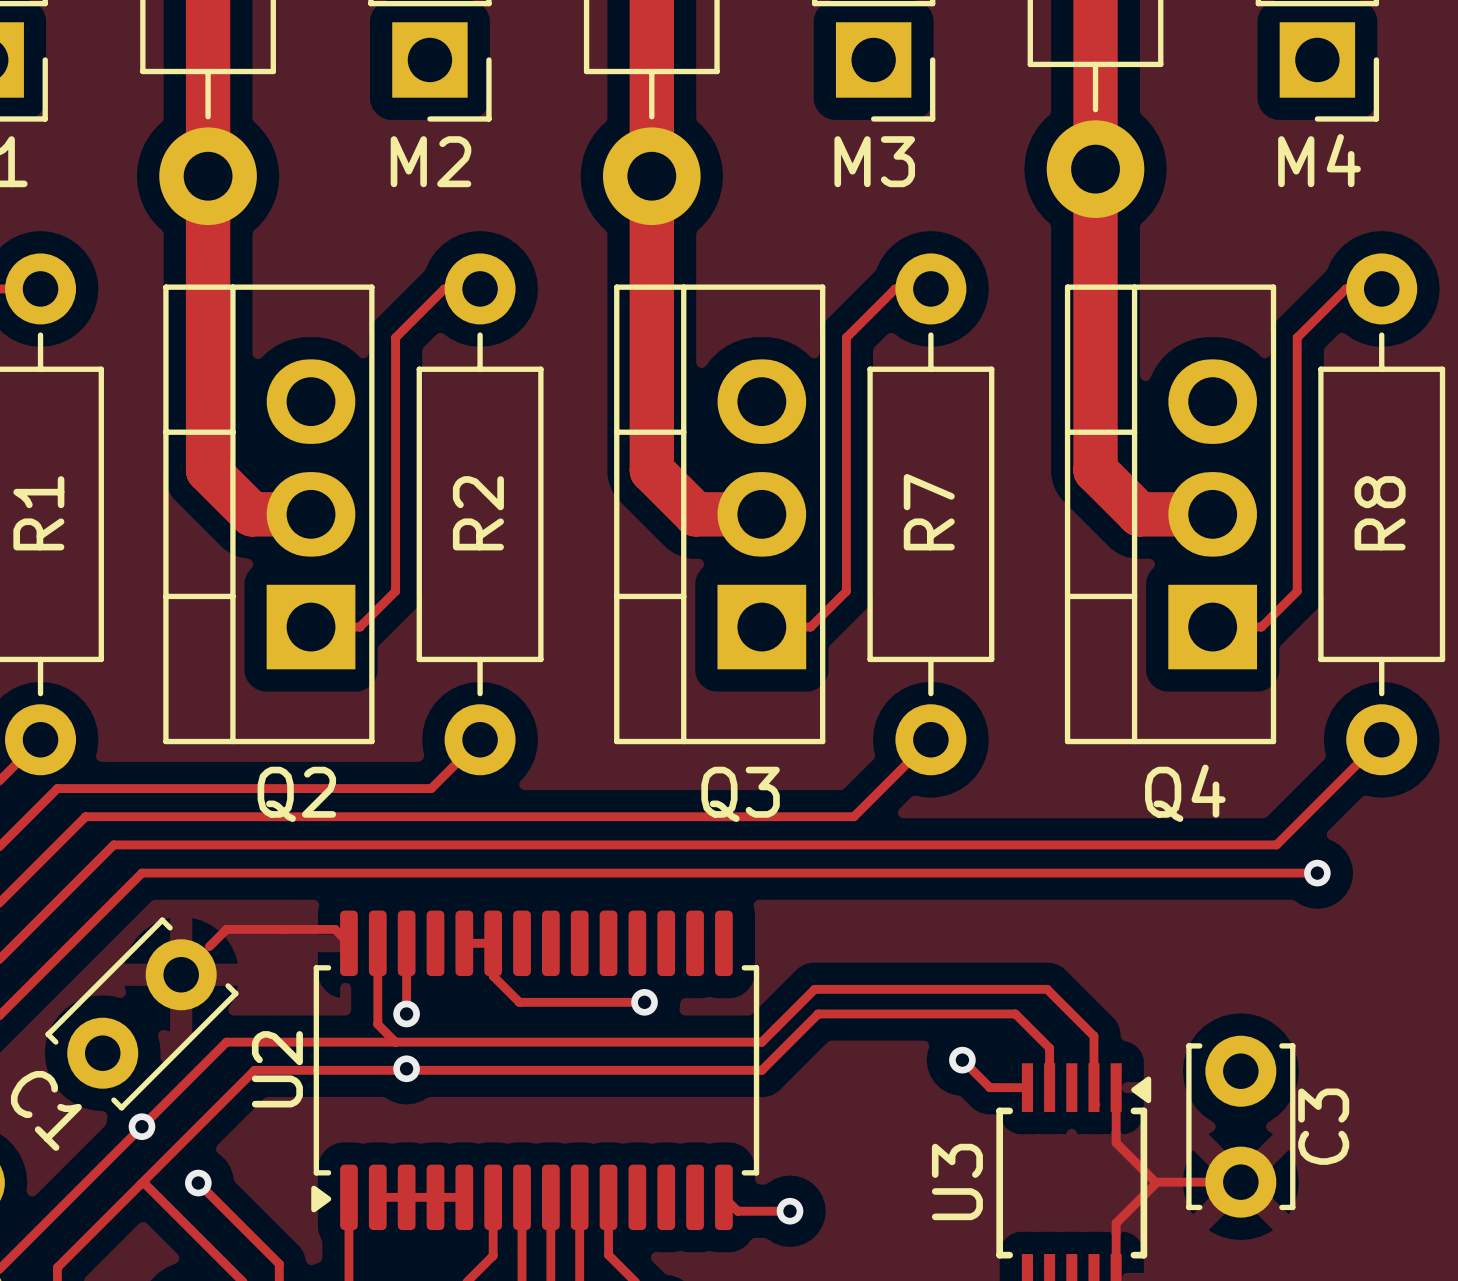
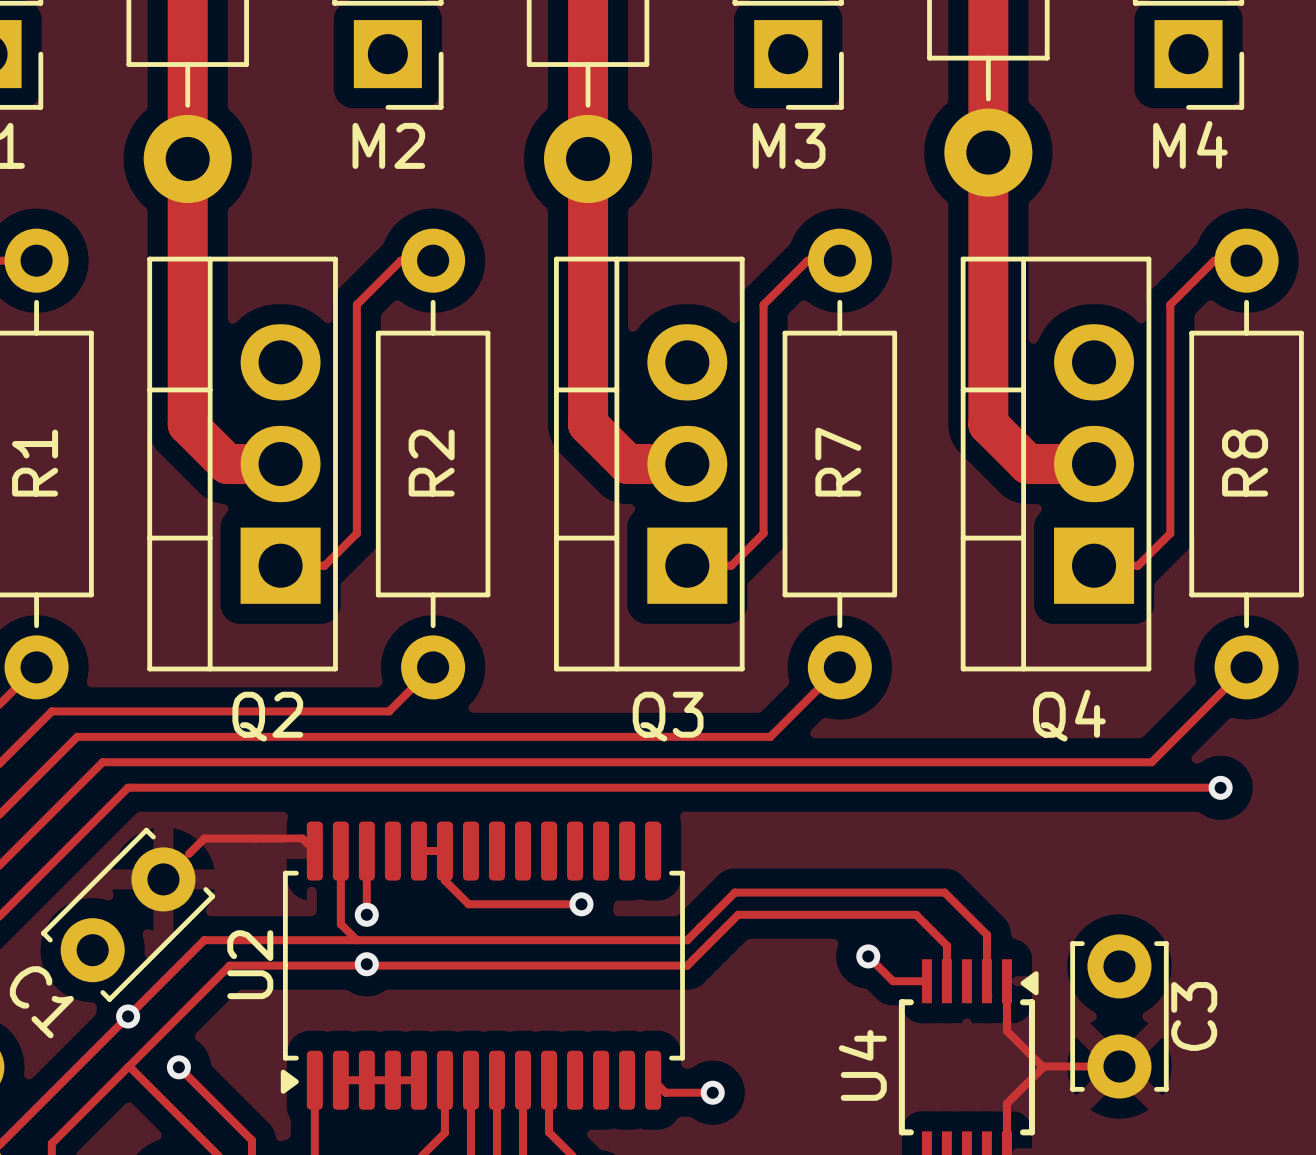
track: none -> (1188, 787) (1220, 787)
via position: (1317, 873) -> (1220, 787)
U3 name: U3 (957, 1181) -> U4 (862, 1065)

